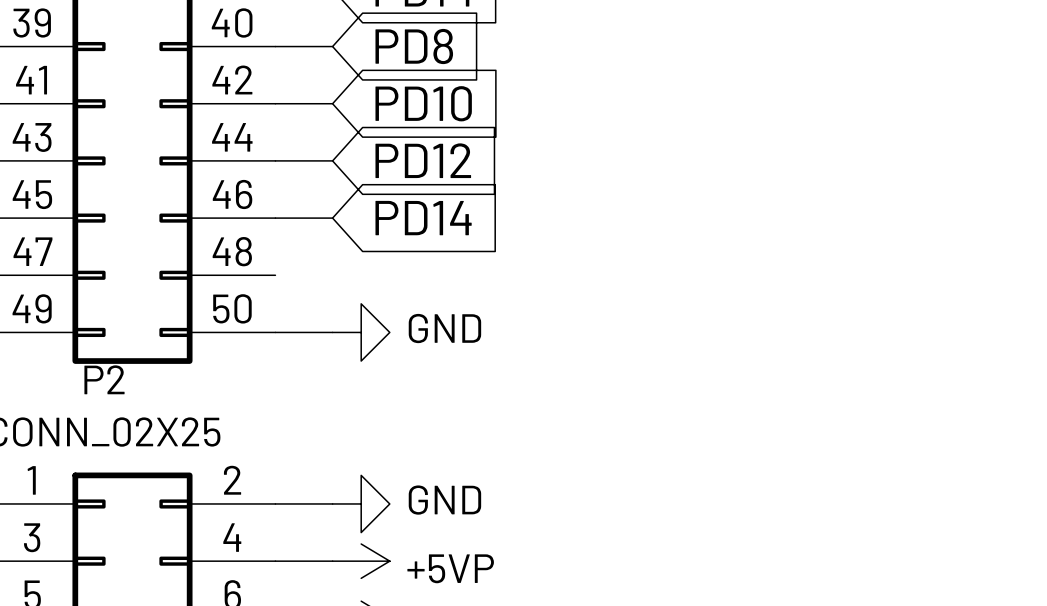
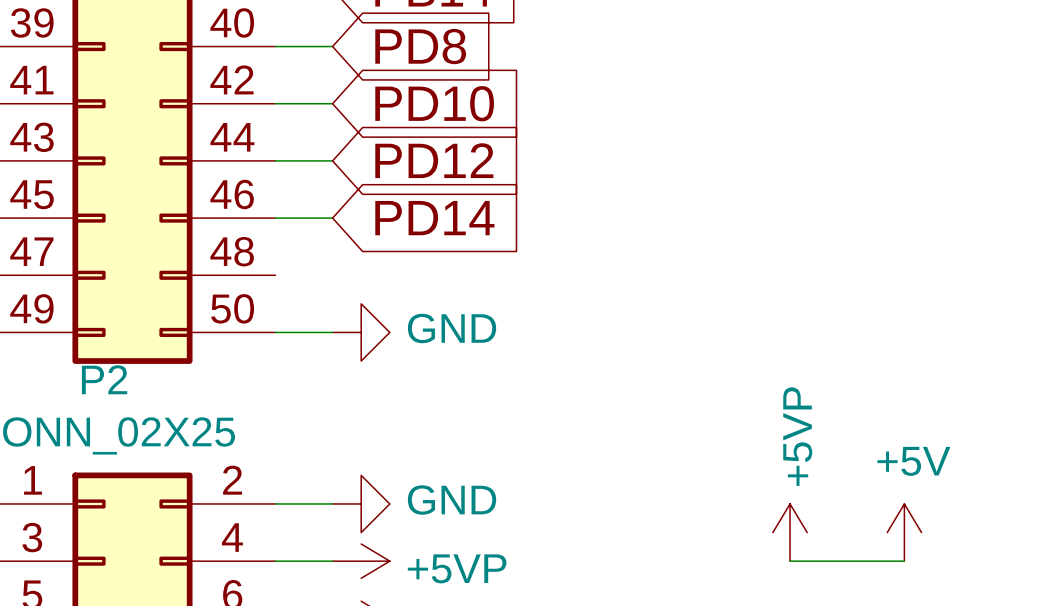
power symbol: none -> +5VP (790, 532)
power symbol: none -> +5V (904, 532)
wire: none -> (790, 561) (904, 561)

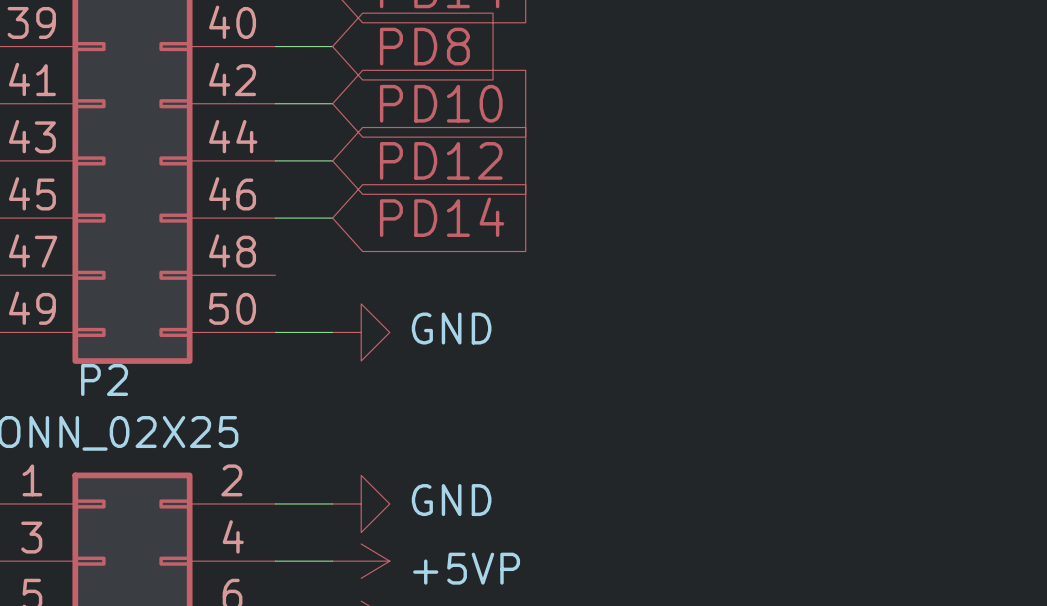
power symbol: +5VP (790, 532) -> none
power symbol: +5V (904, 532) -> none
wire: (790, 561) (904, 561) -> none

